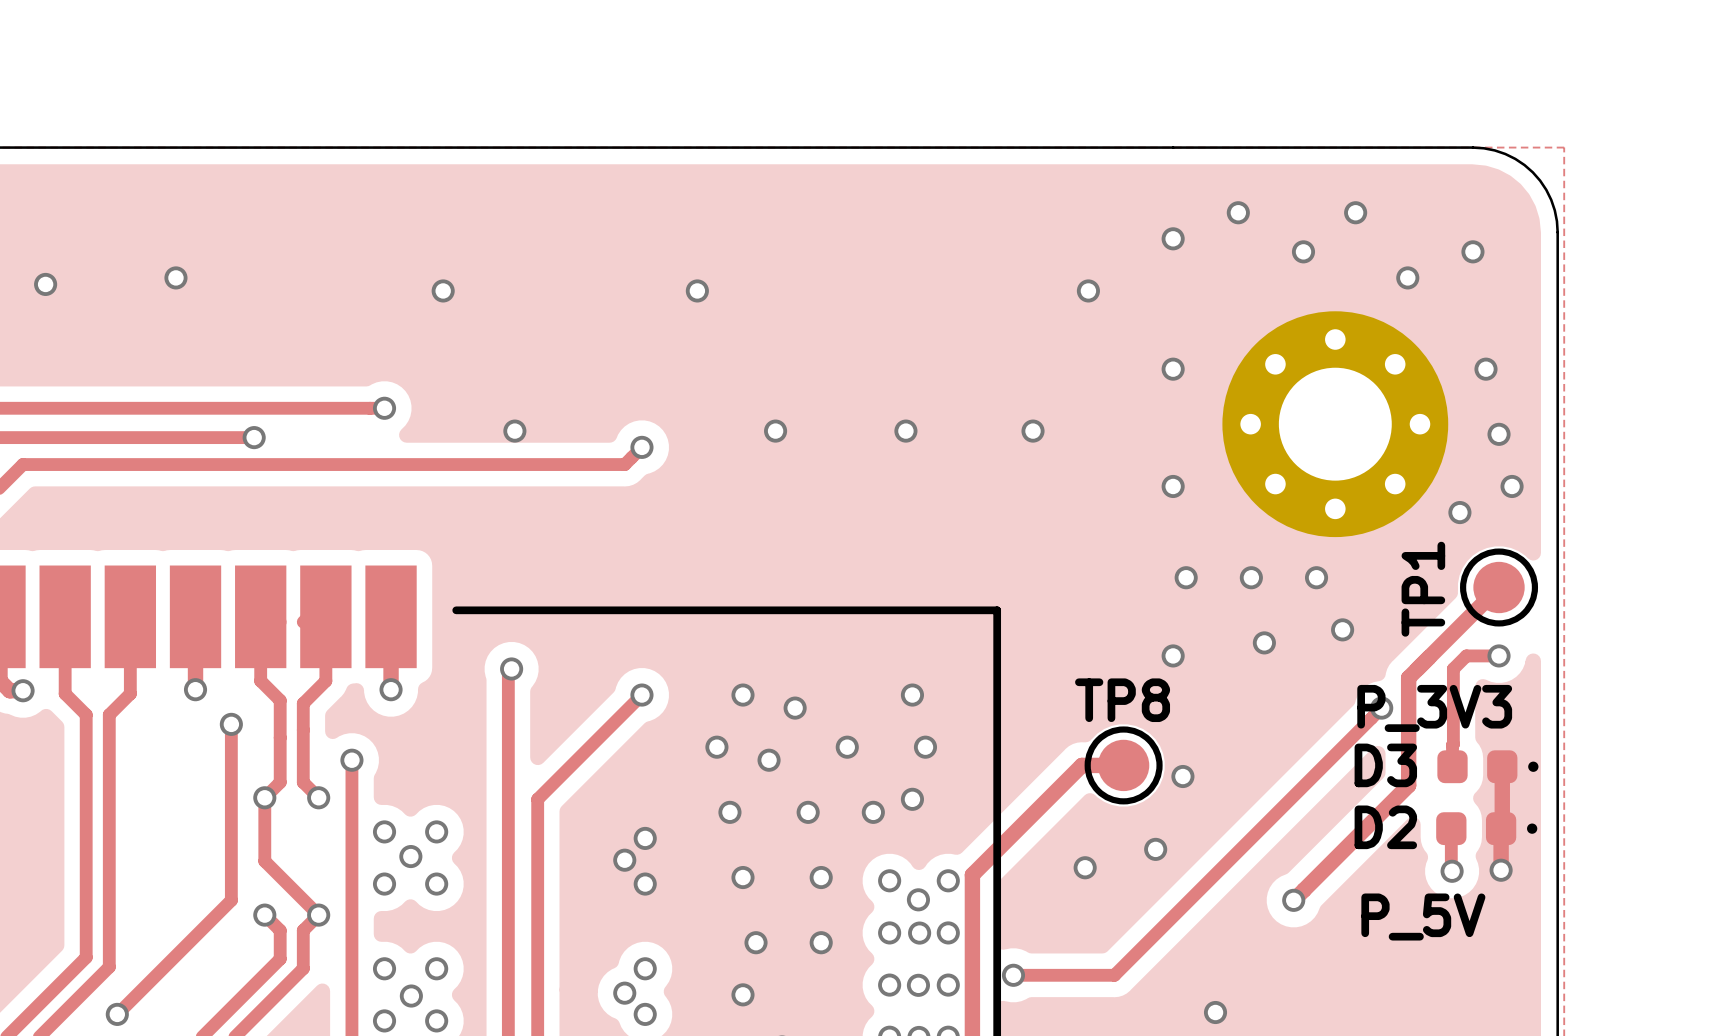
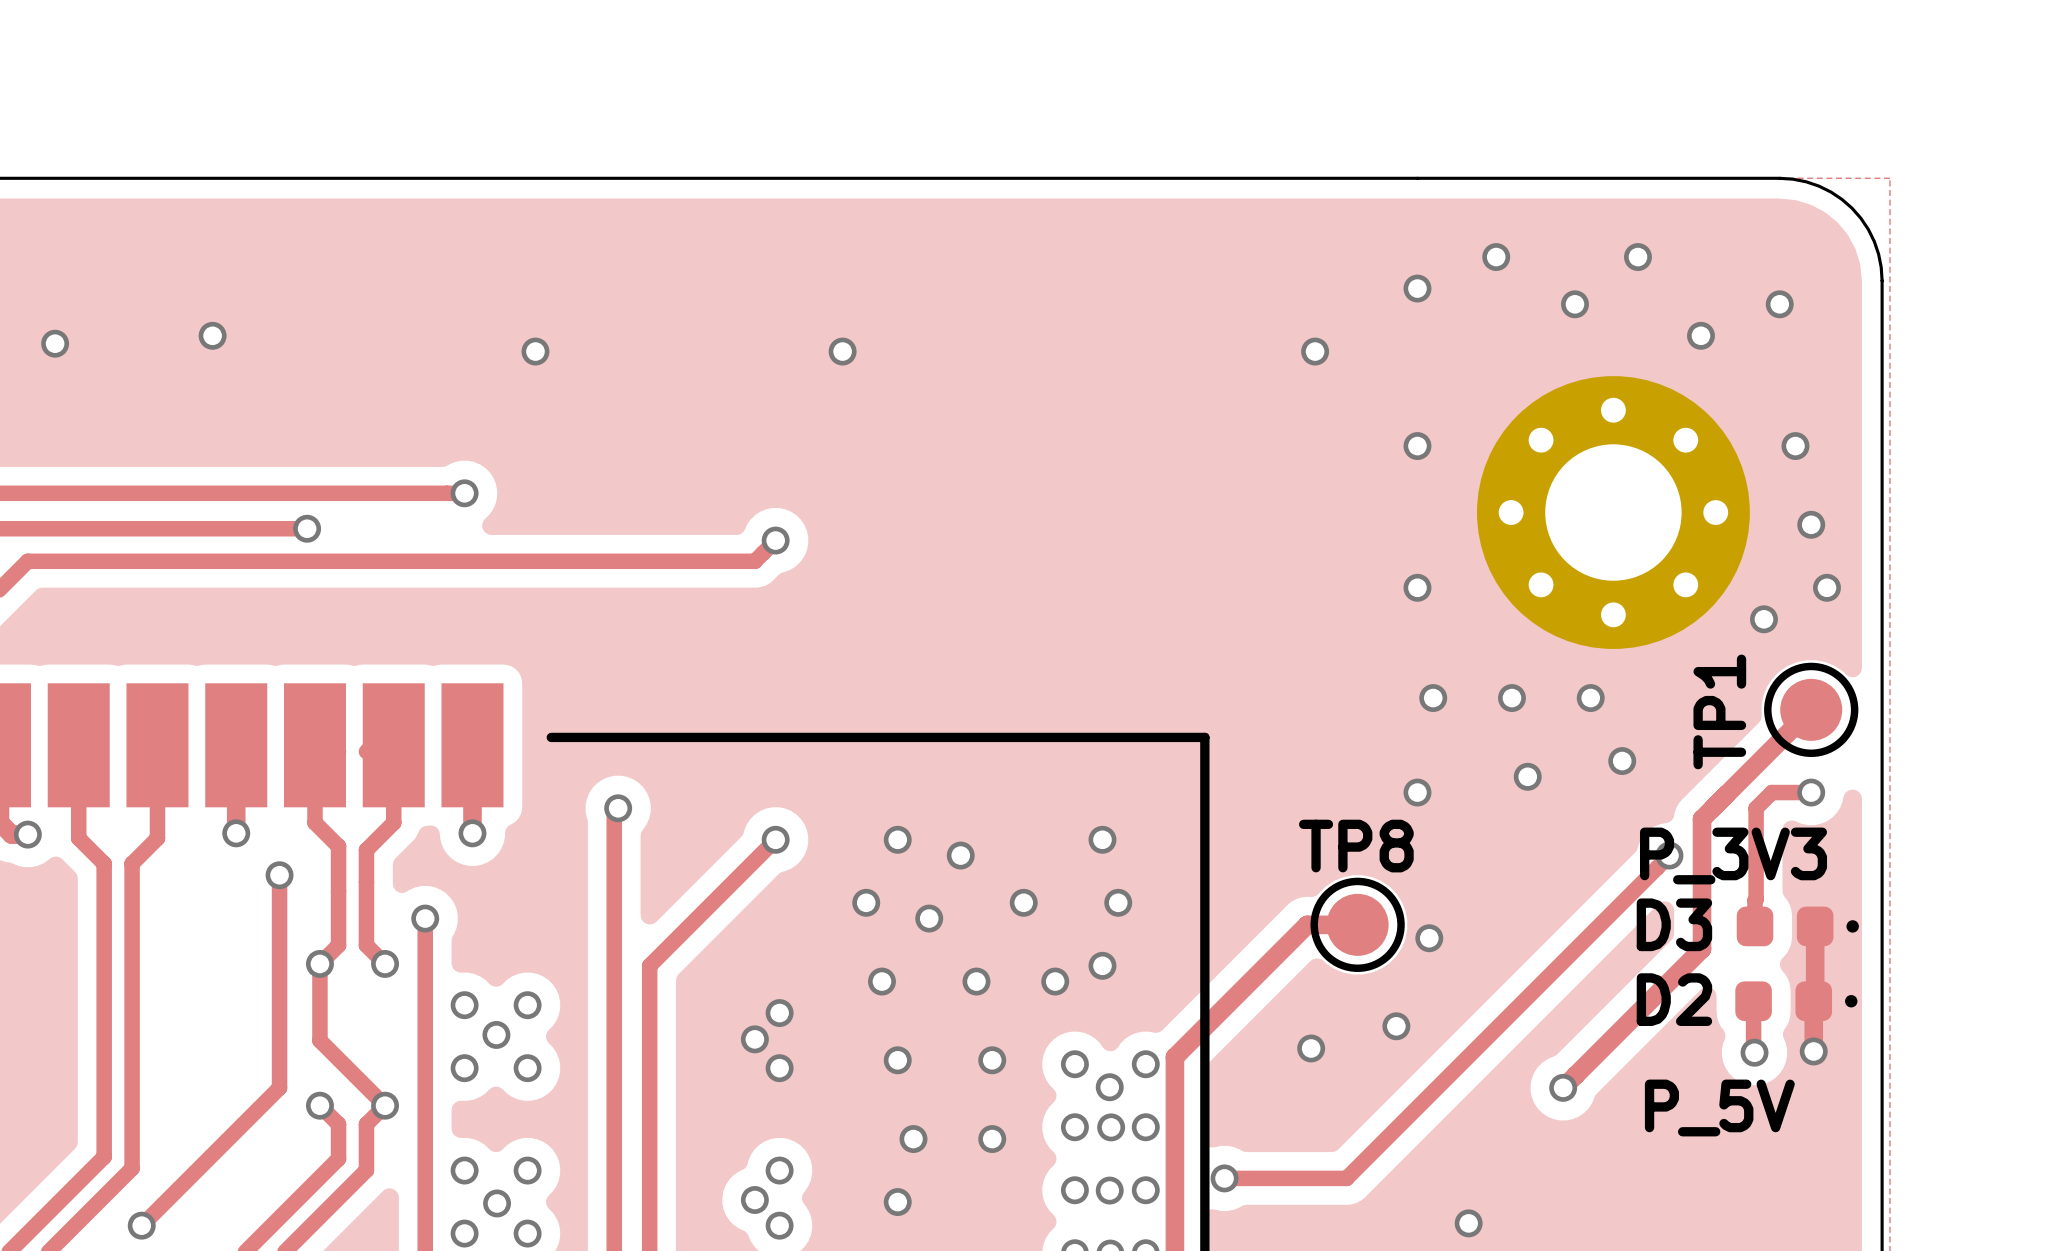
via: (514, 431) -> none
via: (775, 431) -> none
via: (905, 431) -> none
via: (1033, 431) -> none

